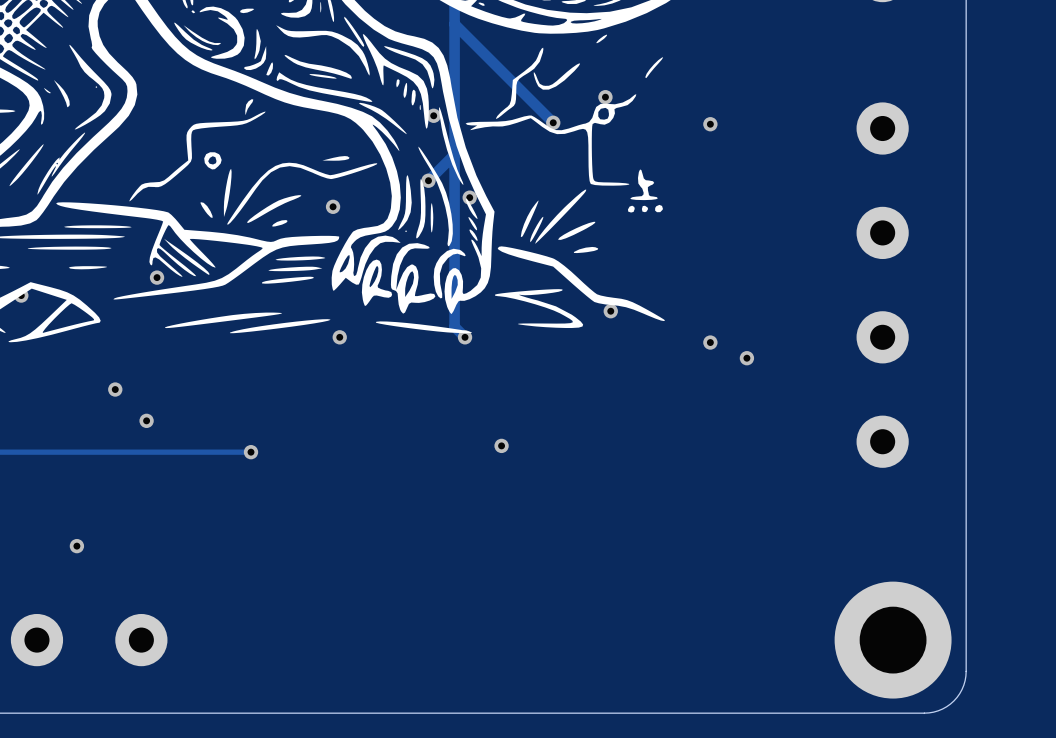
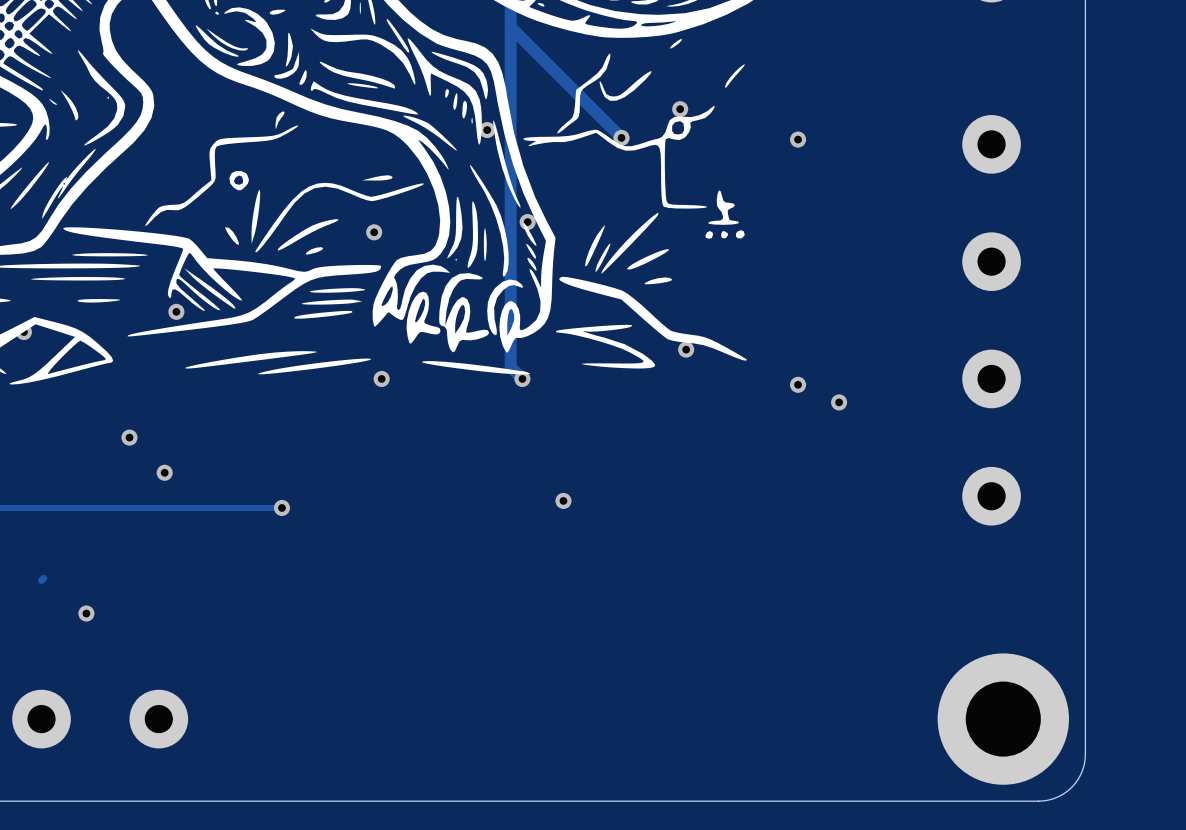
track: (454, 154) (428, 180) -> none
via: (428, 180) -> none
track: none -> (43, 578) (41, 580)

